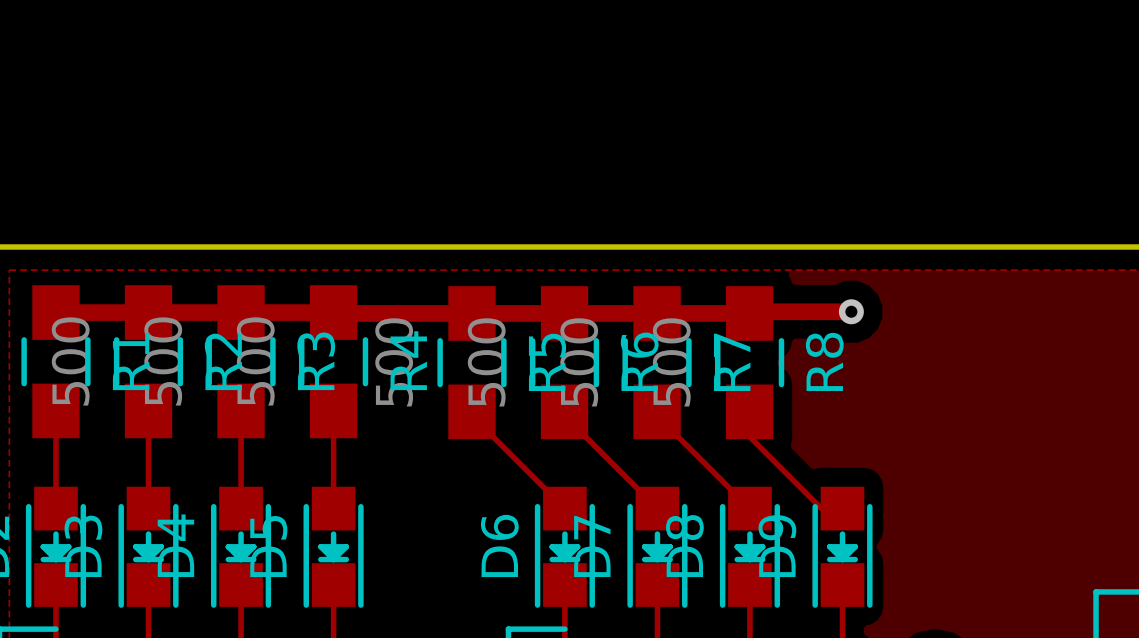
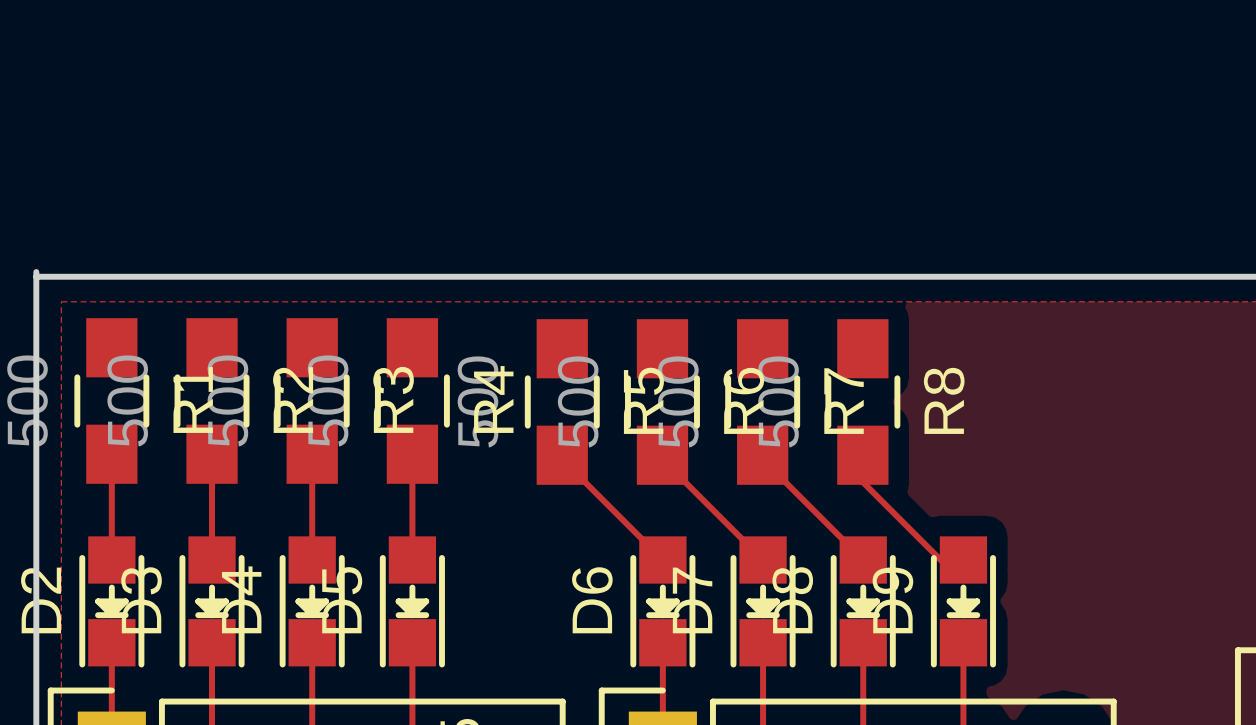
track: (851, 311) (751, 311) (749, 313) (55, 312) -> none
via: (851, 311) -> none

